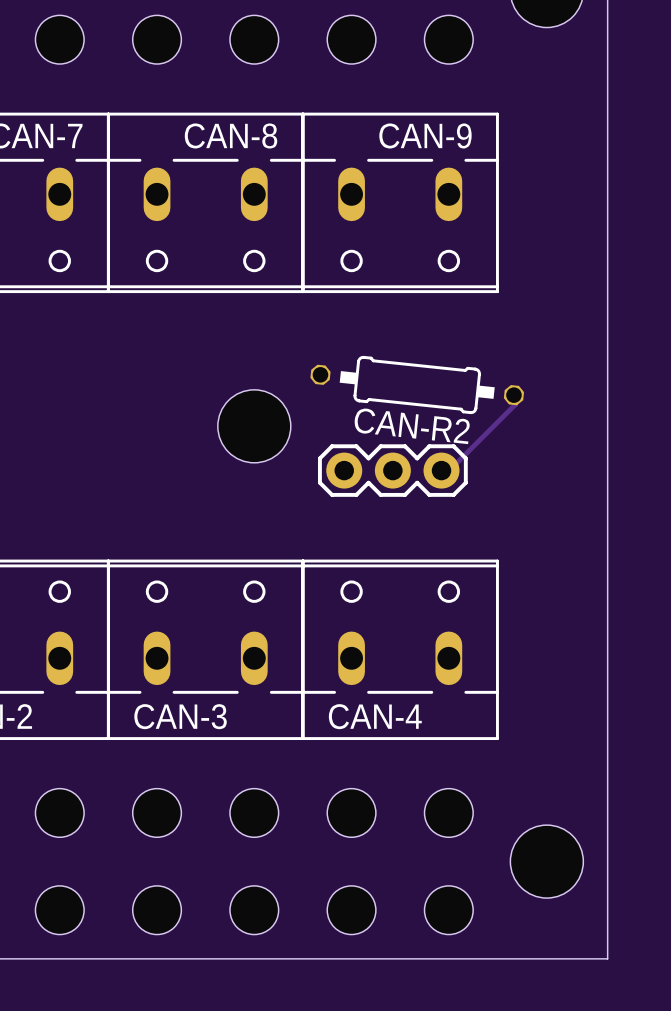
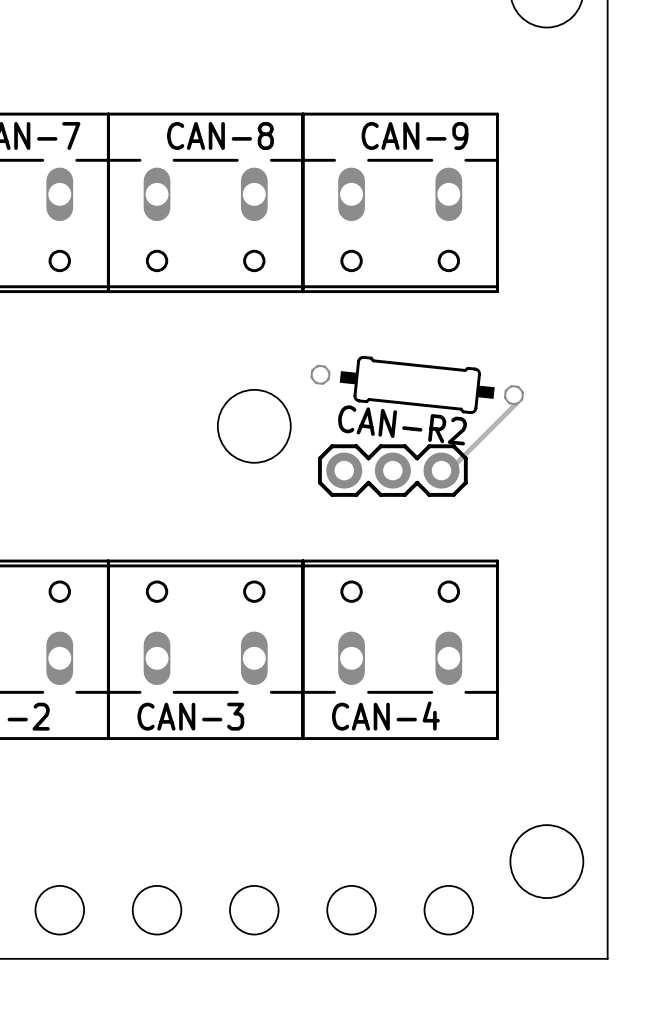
hole: (59, 39) -> none
hole: (157, 39) -> none
hole: (254, 39) -> none
hole: (351, 39) -> none
hole: (448, 39) -> none
hole: (59, 812) -> none
hole: (157, 812) -> none
hole: (254, 812) -> none
hole: (351, 812) -> none
hole: (448, 812) -> none

